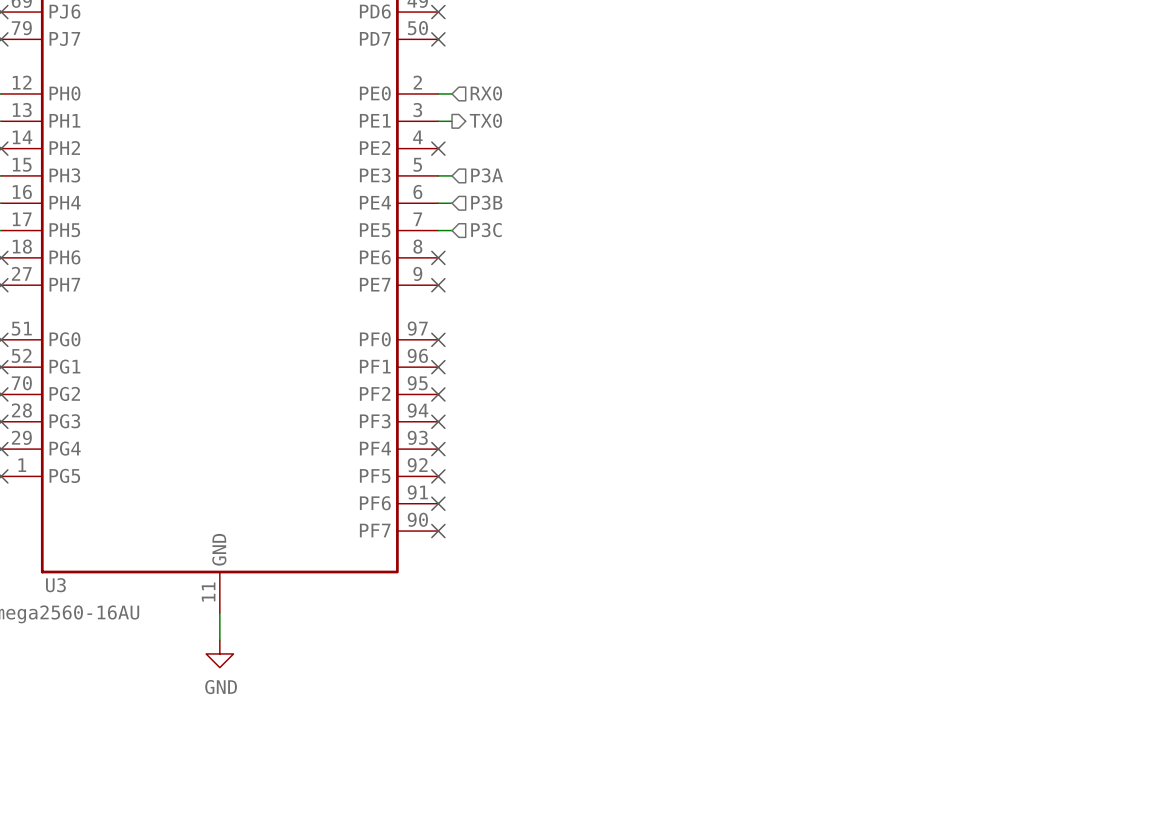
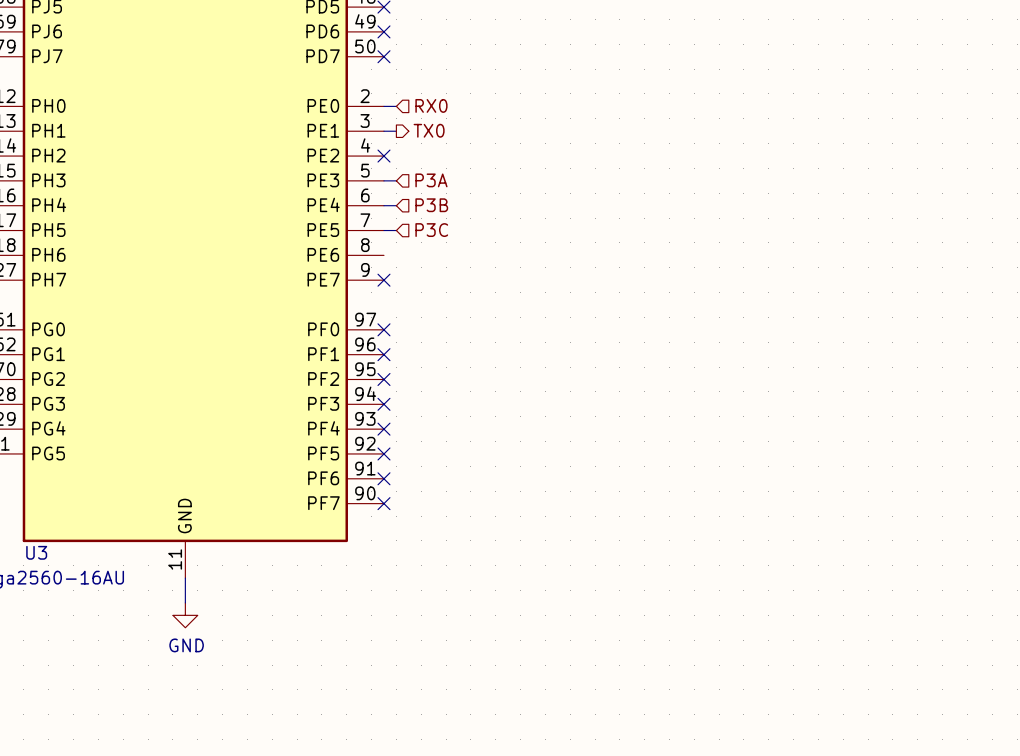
no-connect mark: (438, 257) -> none

